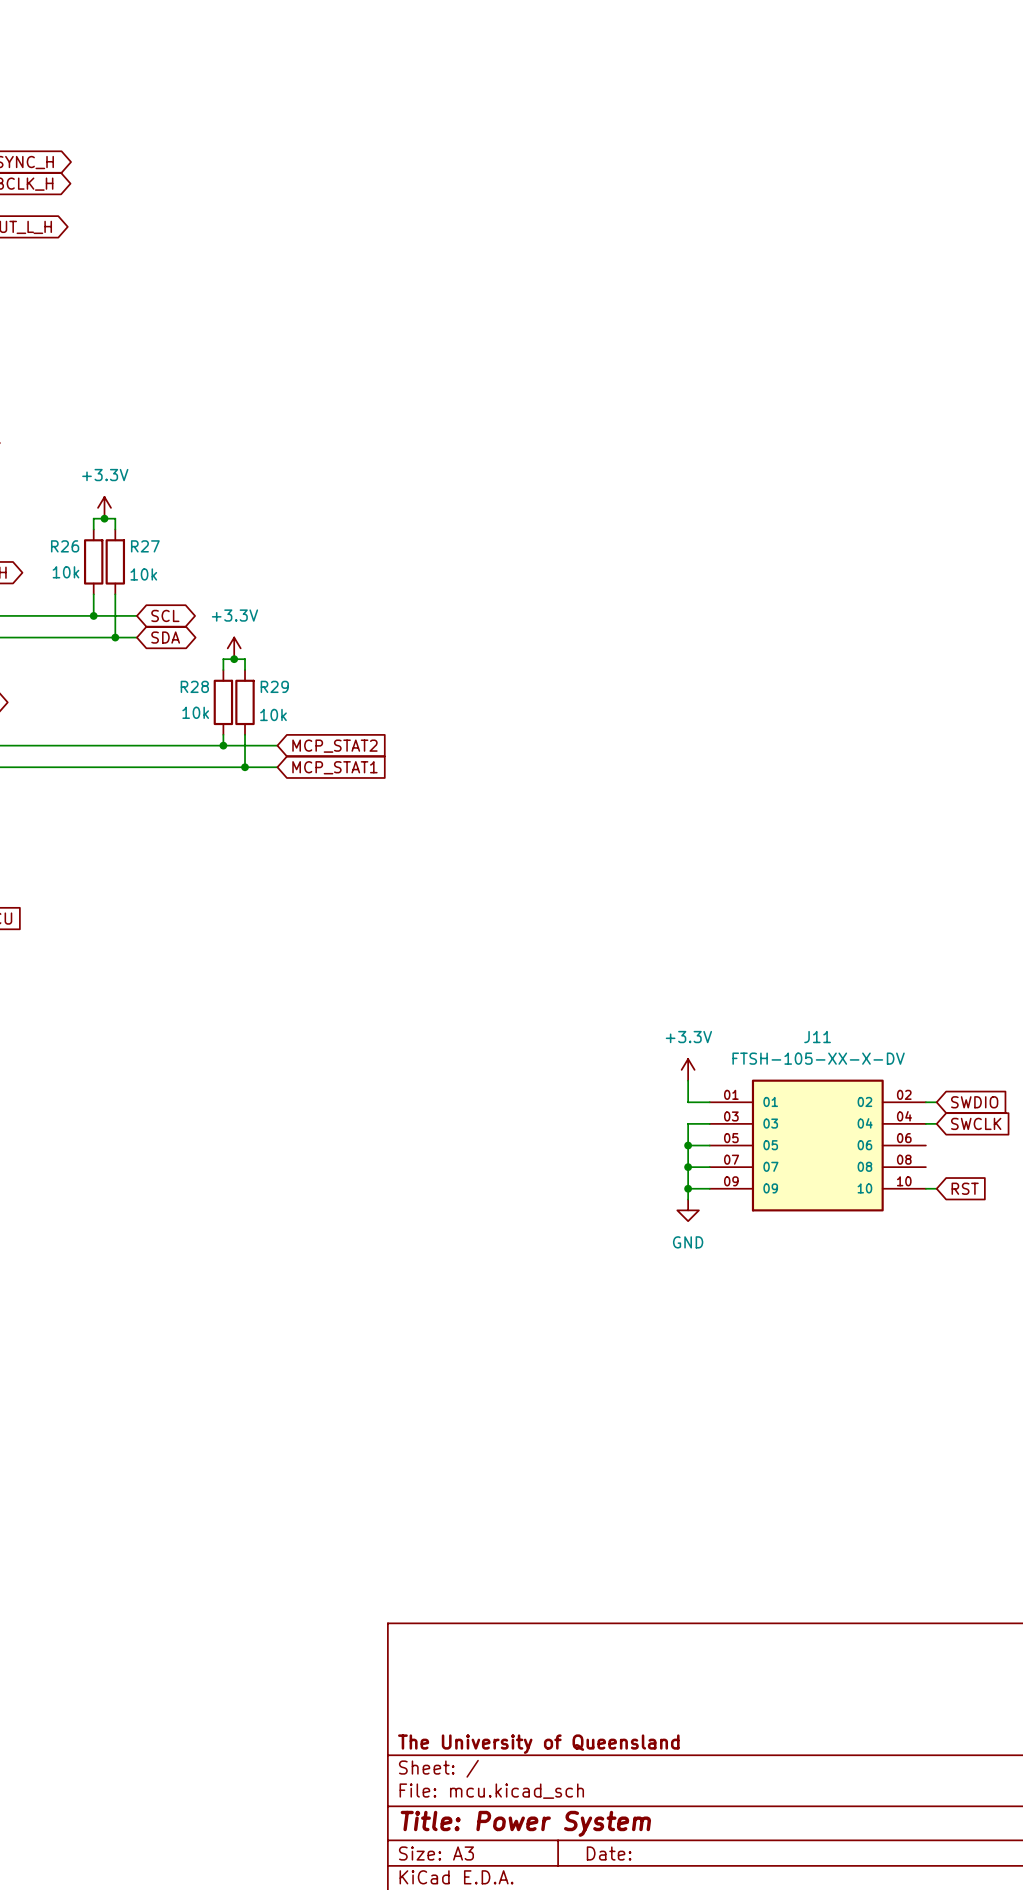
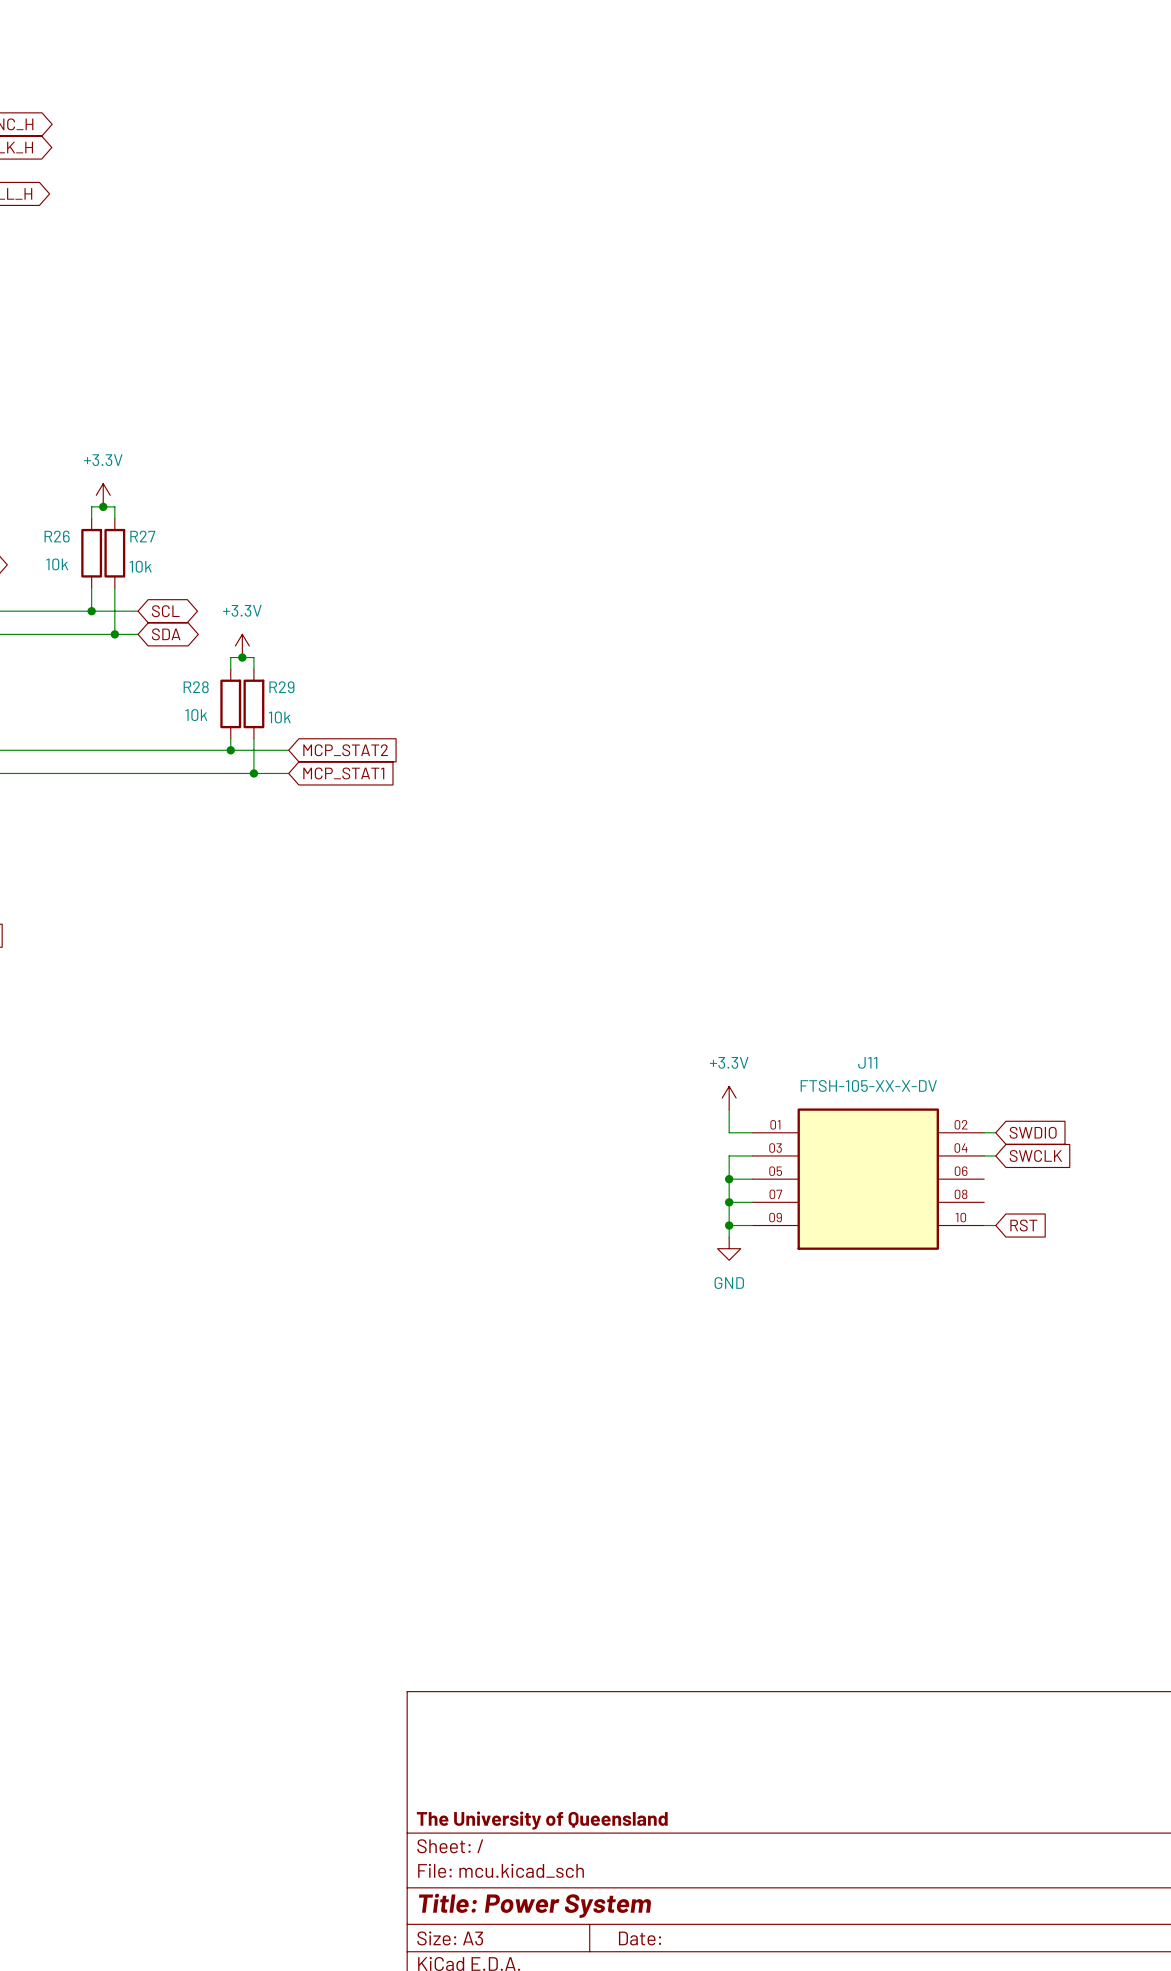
J11 symbol: [709, 1079, 926, 1212] -> [752, 1108, 985, 1250]

